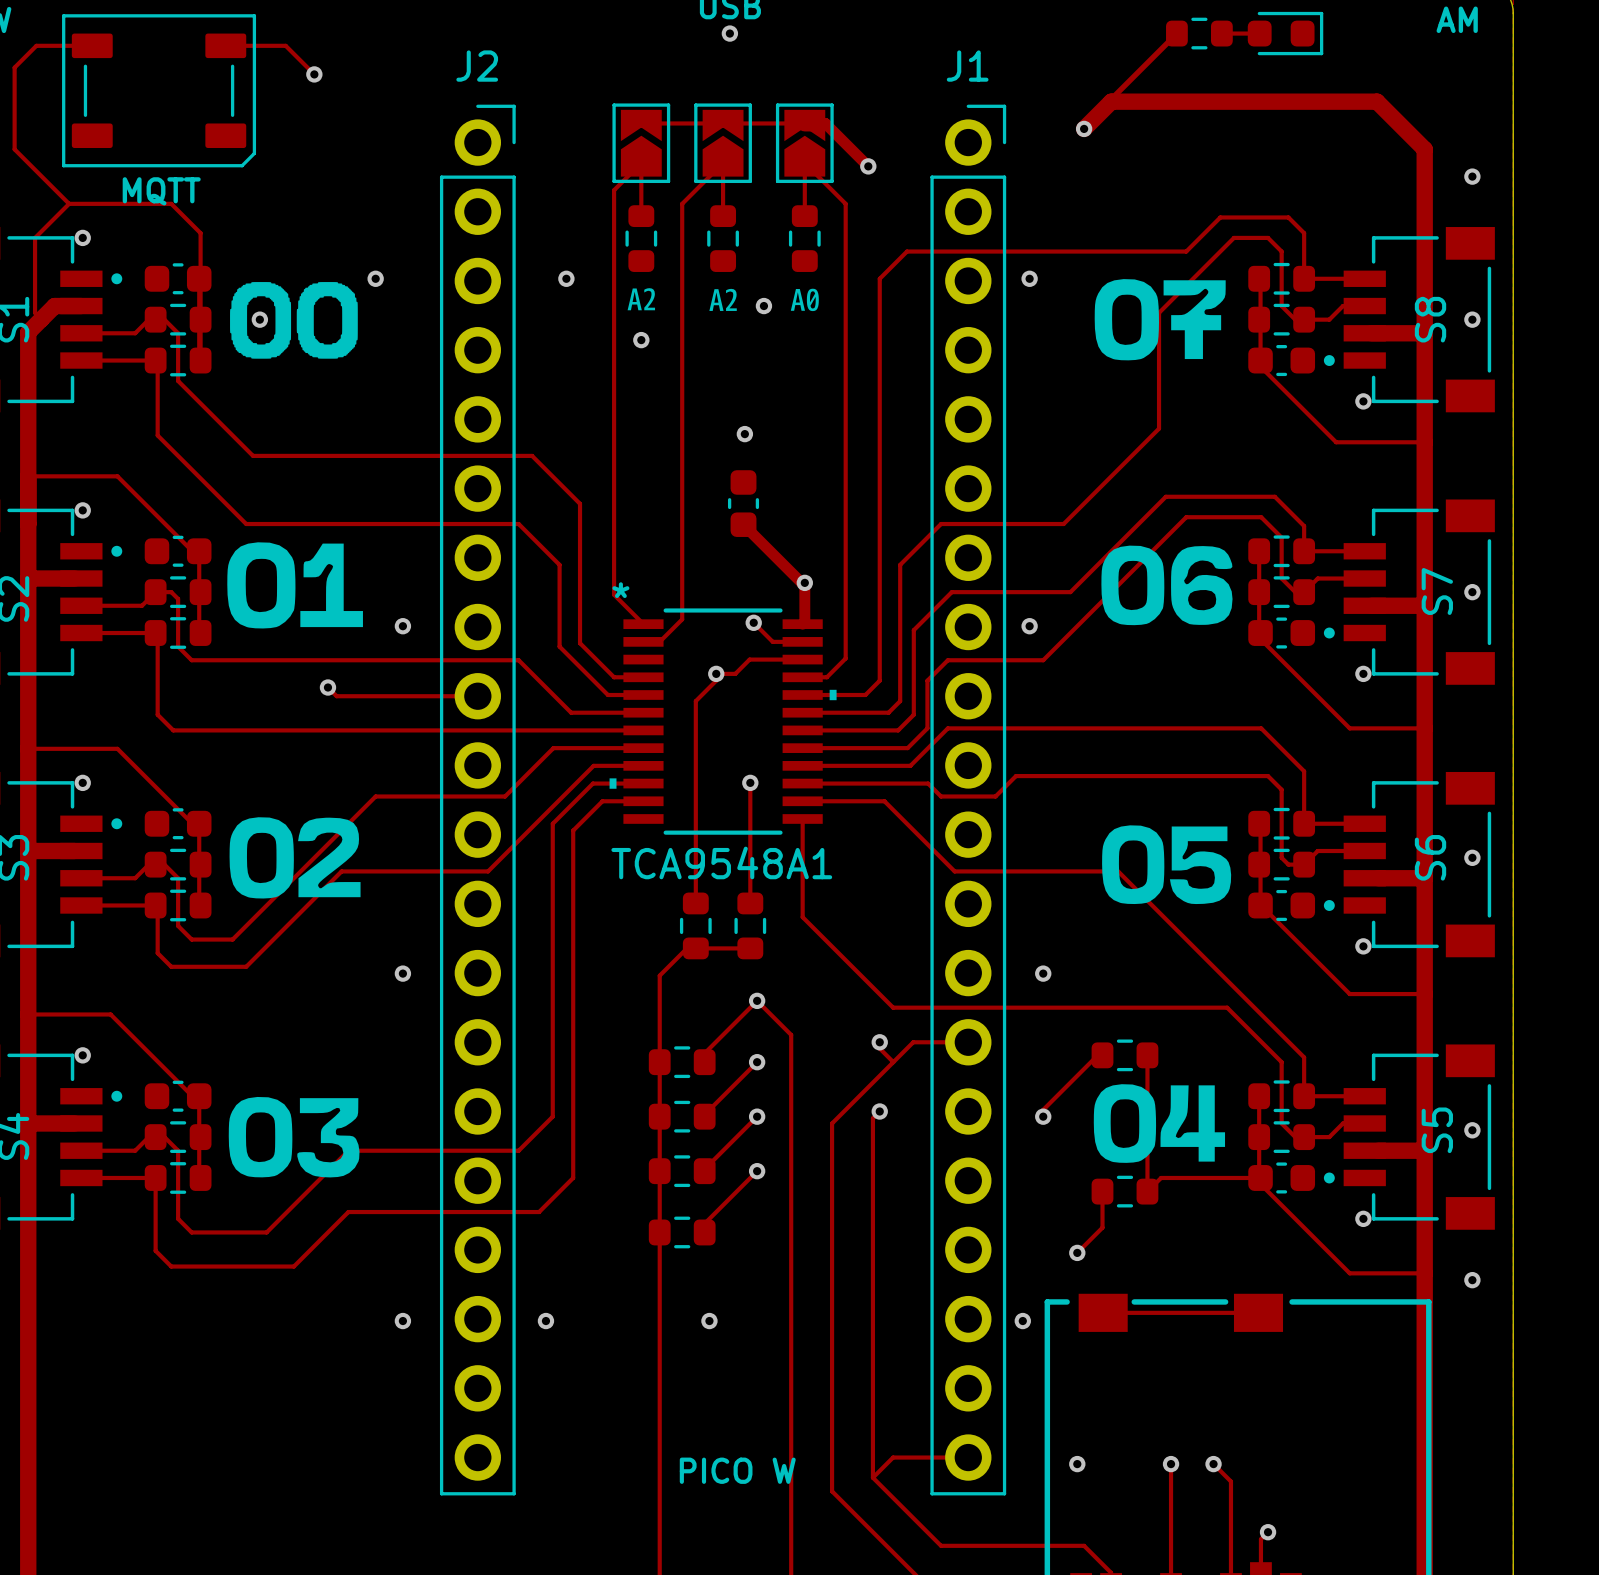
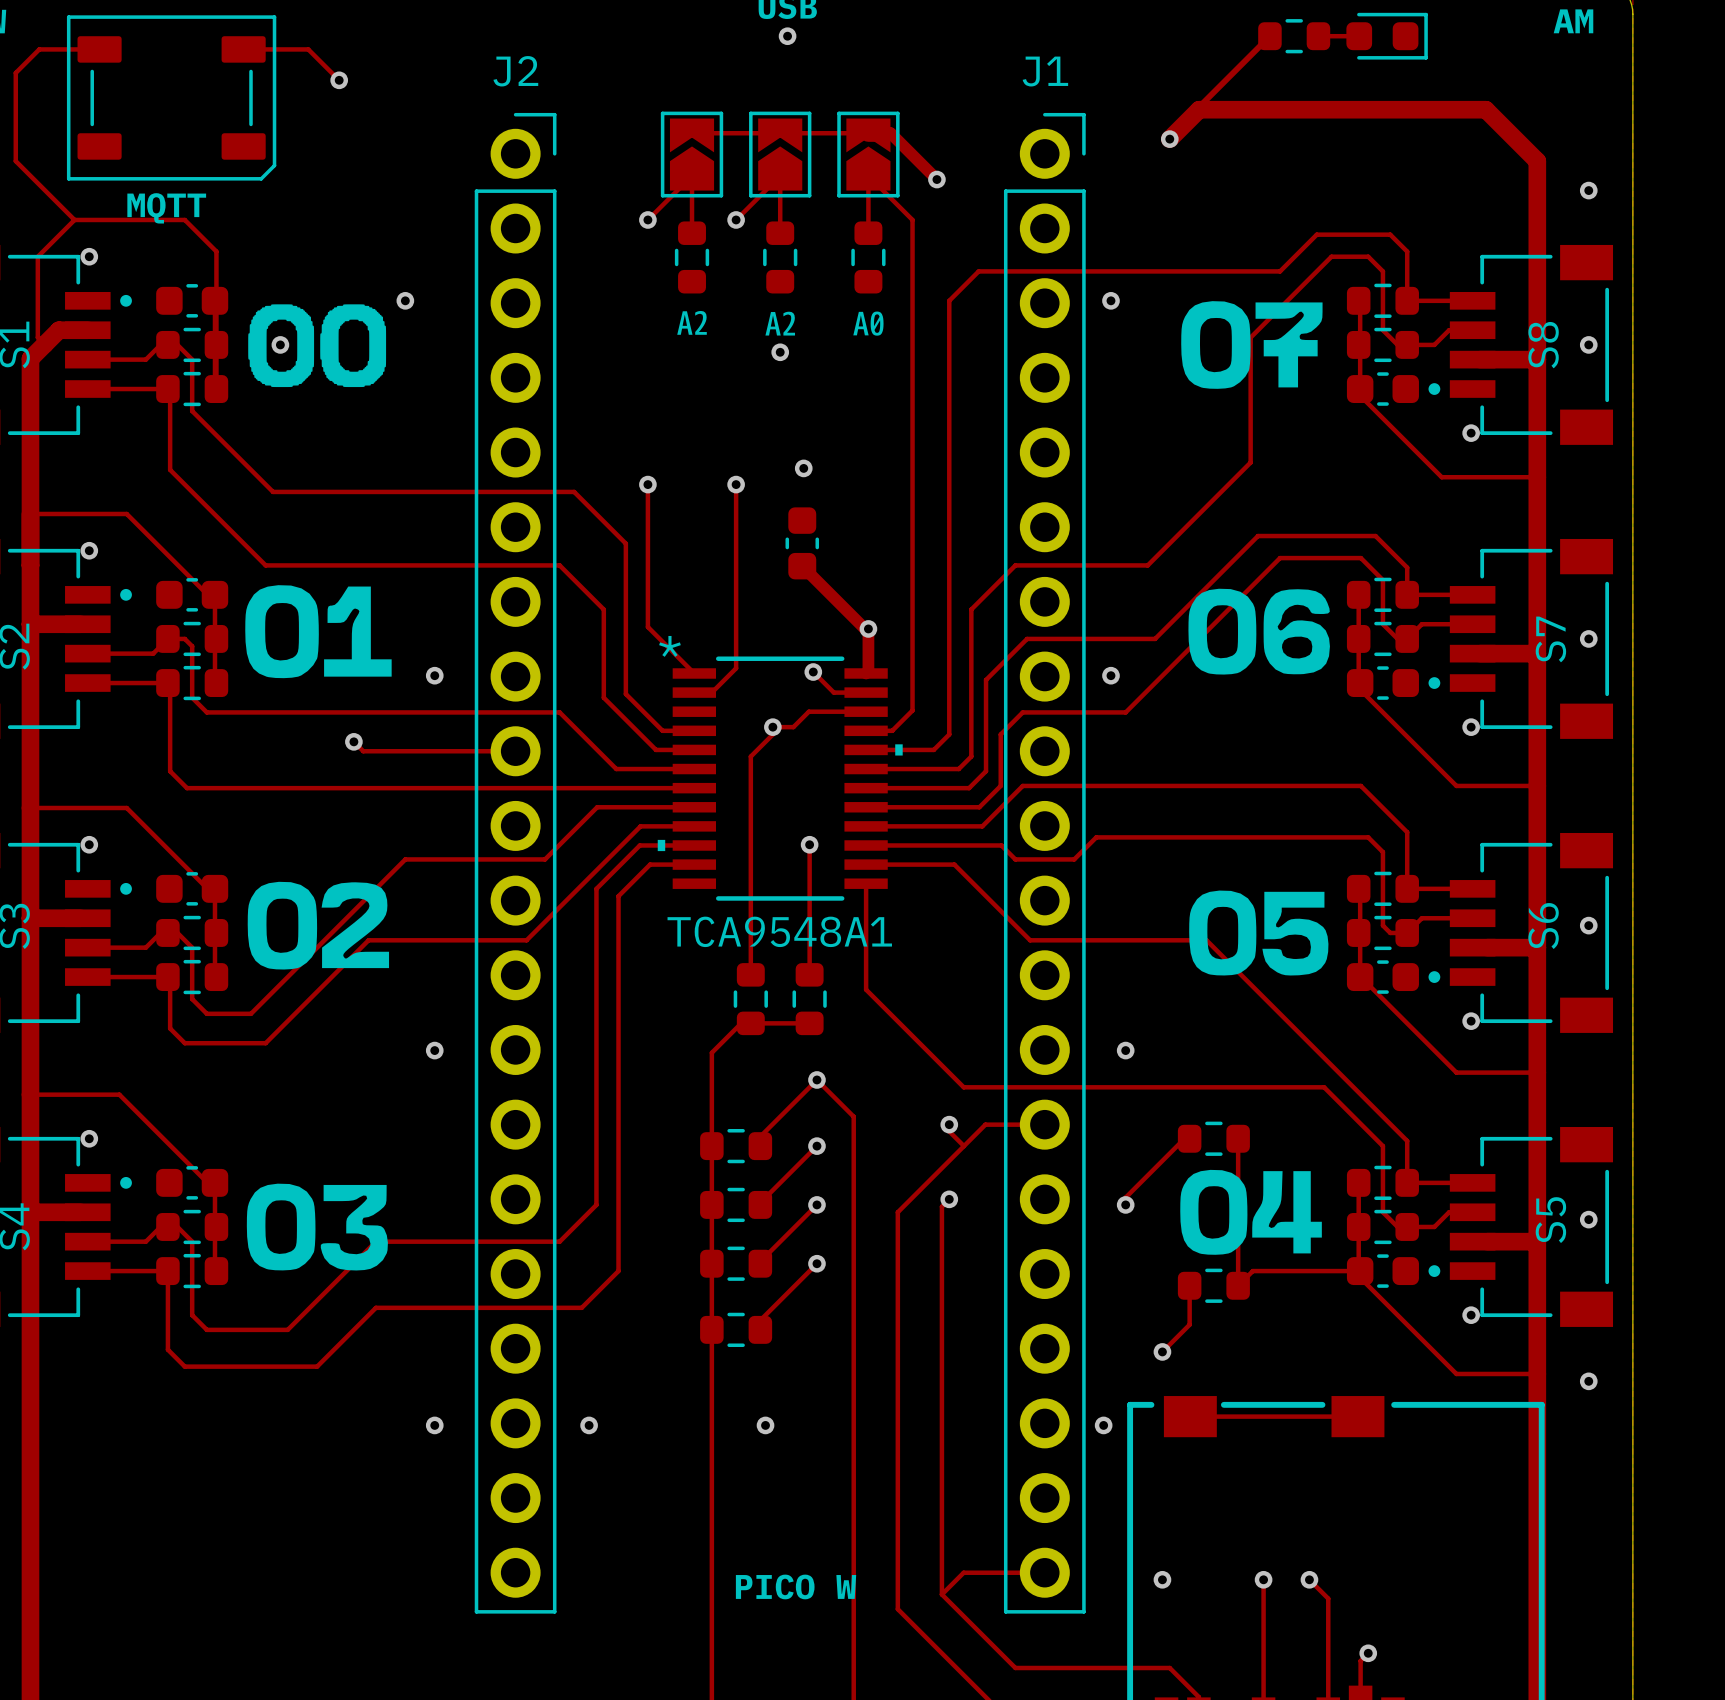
track: (614, 190) (614, 594) -> (647, 484) (647, 627) (662, 641)
track: none -> (662, 205) (647, 219)
via: none -> (647, 219)
track: (682, 203) (682, 449) -> none
via: none -> (736, 219)
via: (566, 278) -> none
via: (763, 306) -> none
via: none -> (780, 352)
via: (641, 340) -> none
via: none -> (647, 484)
via: none -> (736, 484)

